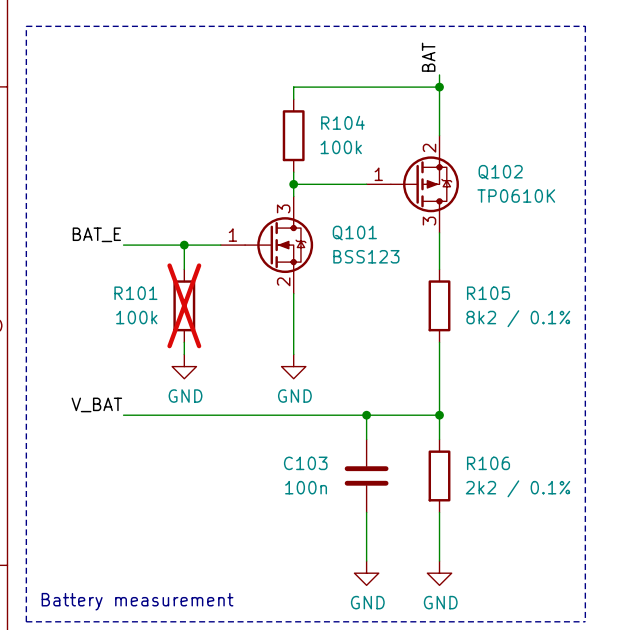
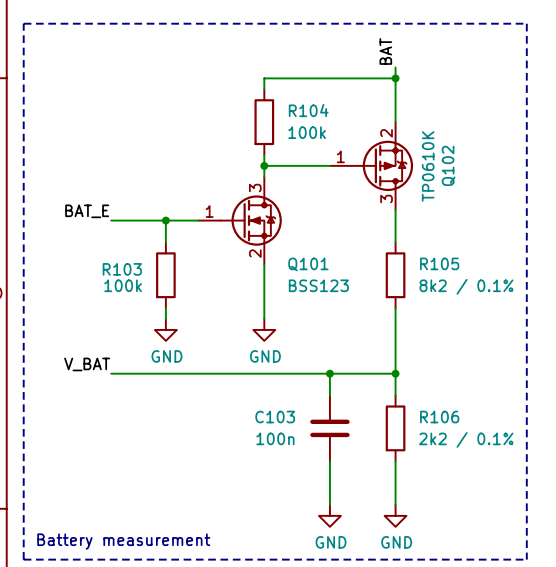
Q102 name rotation: 0° (500, 172) -> 90° counterclockwise (448, 165)
Q102 value rotation: 0° (516, 196) -> 90° counterclockwise (428, 166)
Q101 name position: Q101 (354, 233) -> Q101 (308, 264)
Q101 value position: BSS123 (366, 256) -> BSS123 (318, 285)
R101 name: R101 (135, 293) -> R103 (122, 269)
R101 do-not-place cross: (184, 305) -> none

